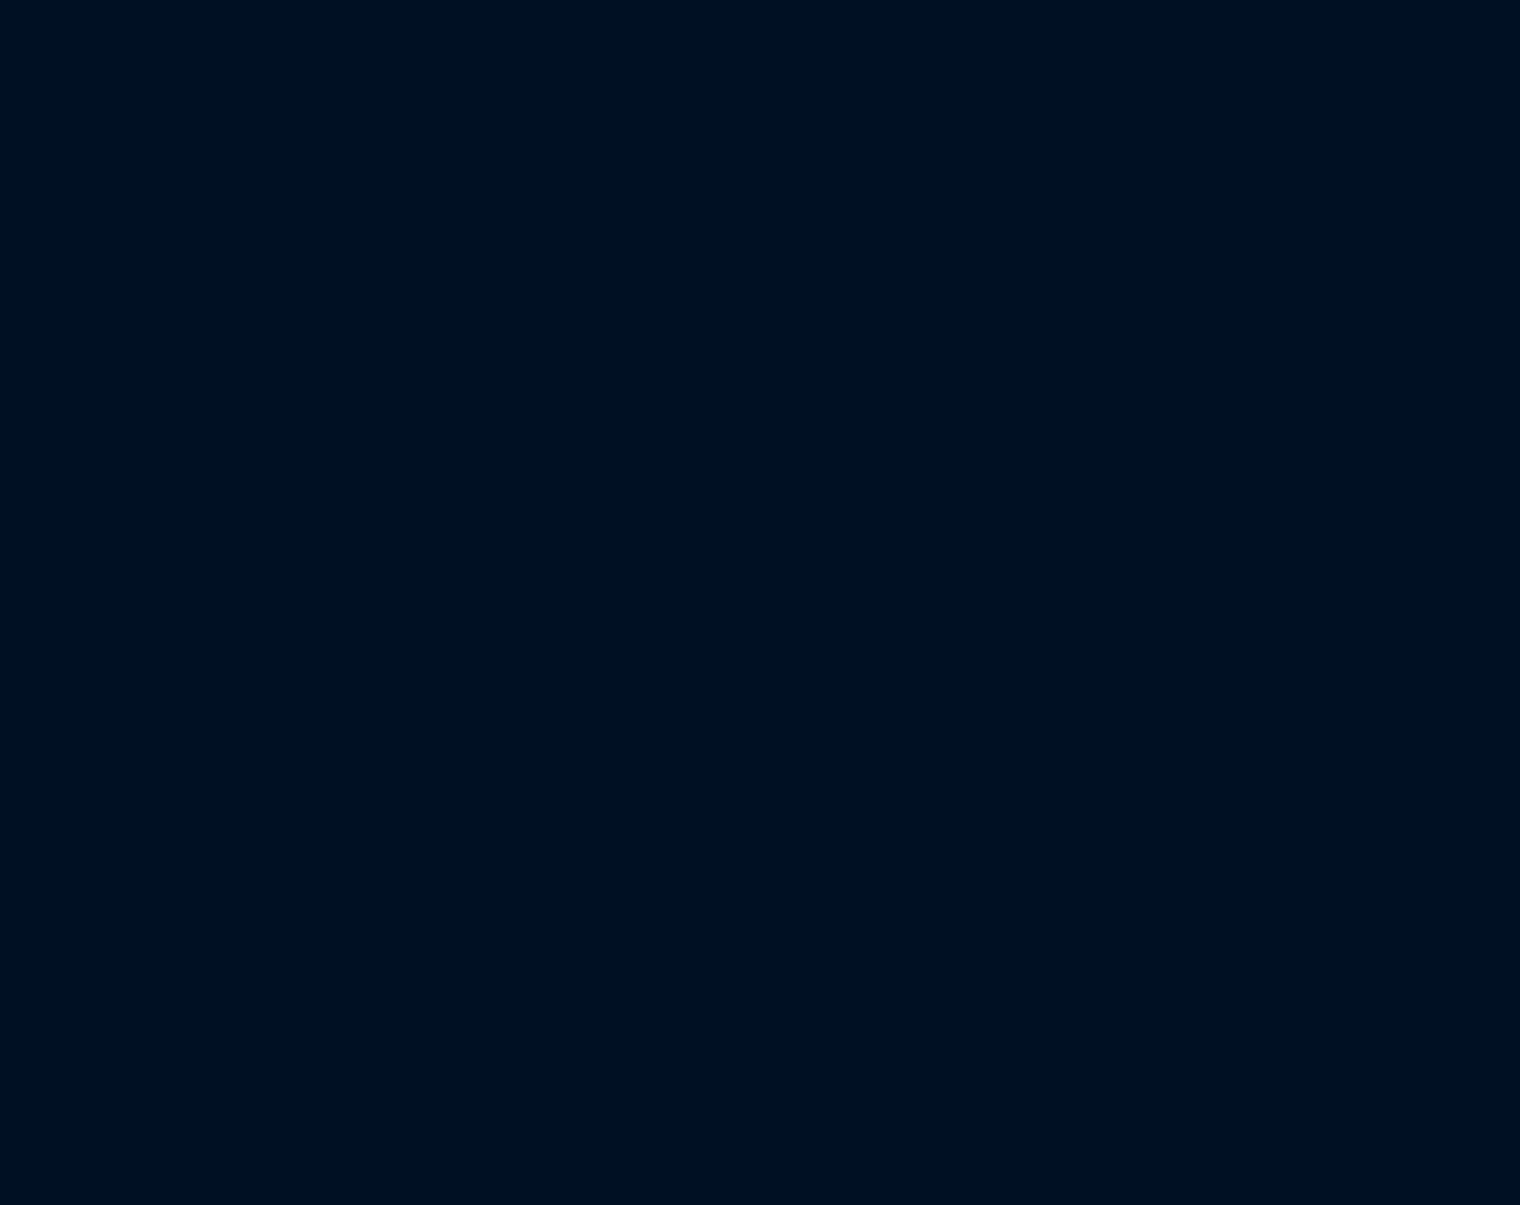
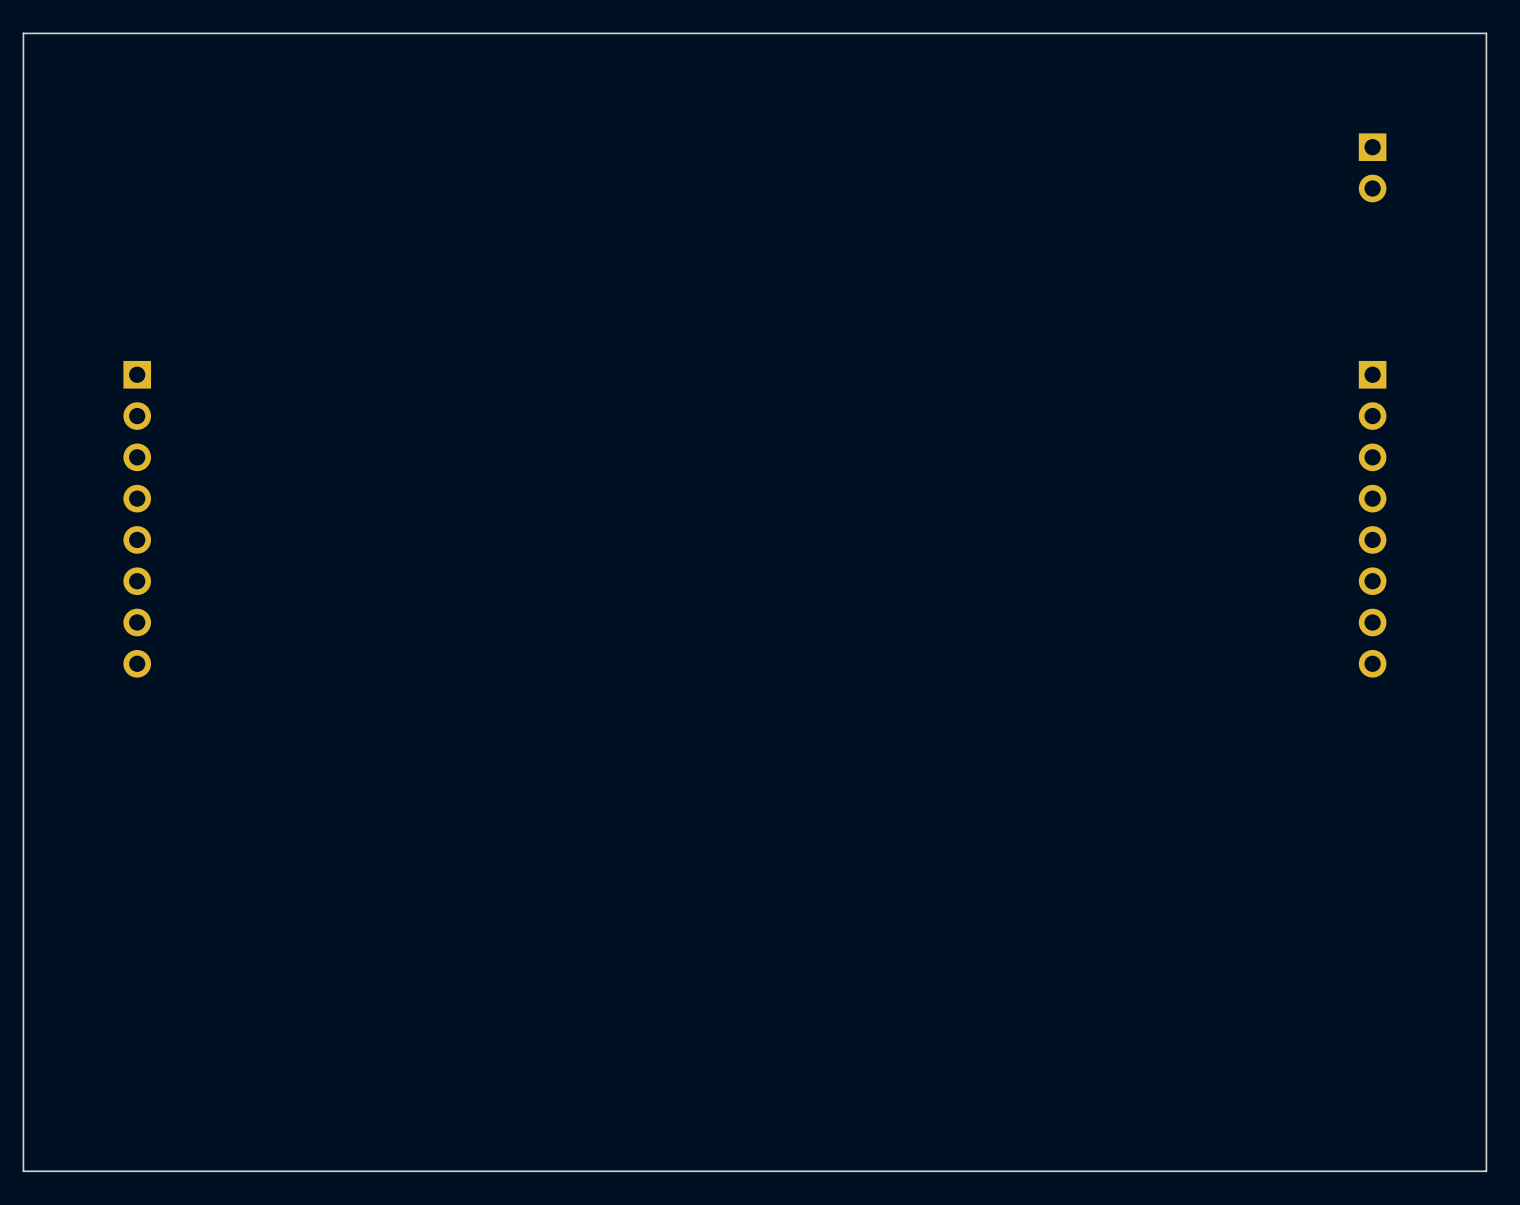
board edge: none -> (1486, 33) (23, 33) (23, 1171) (1486, 1171) (1486, 33)
part: none -> (1372, 167)
part: none -> (137, 519)
part: none -> (1372, 519)

